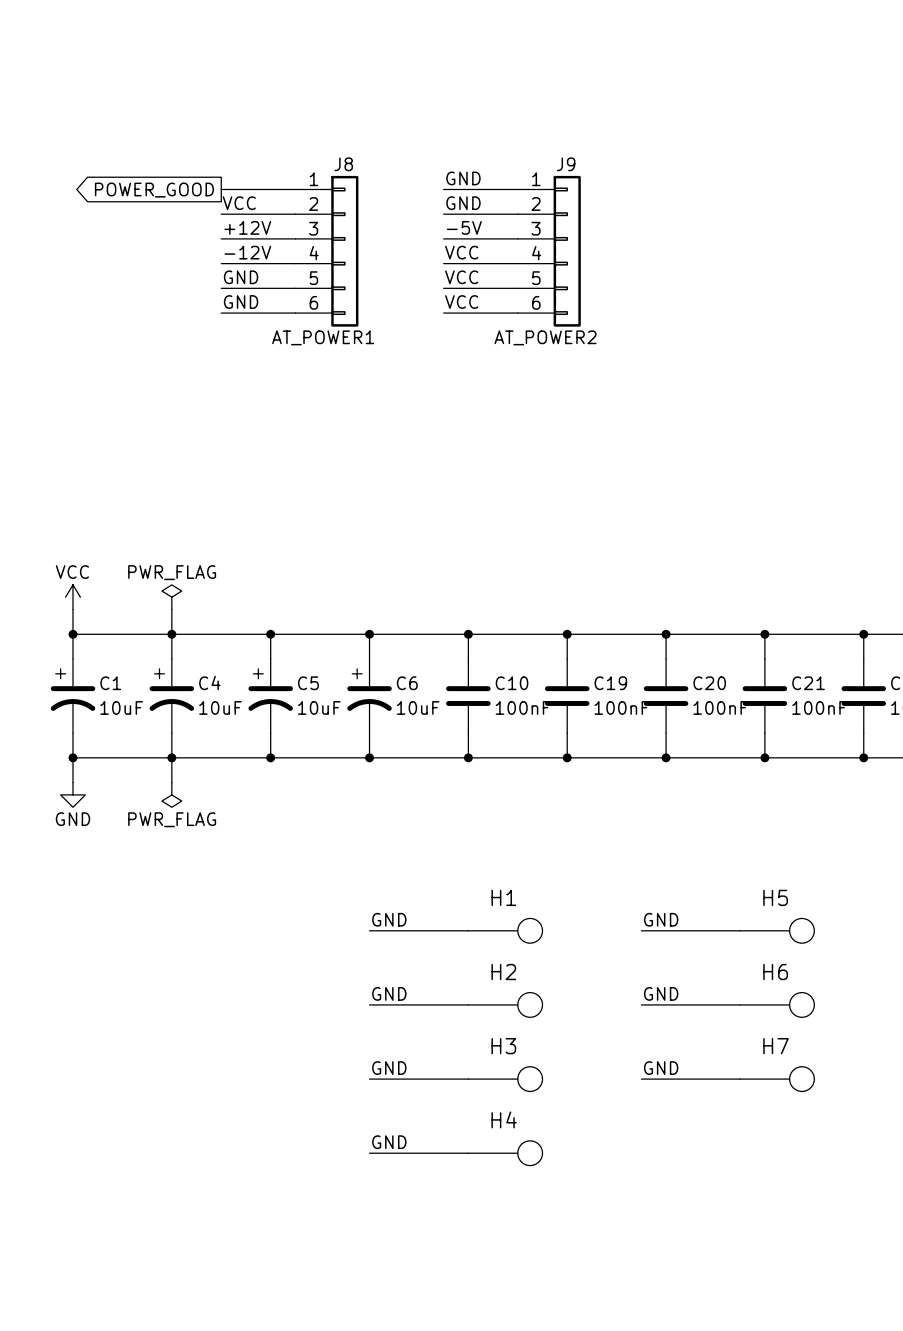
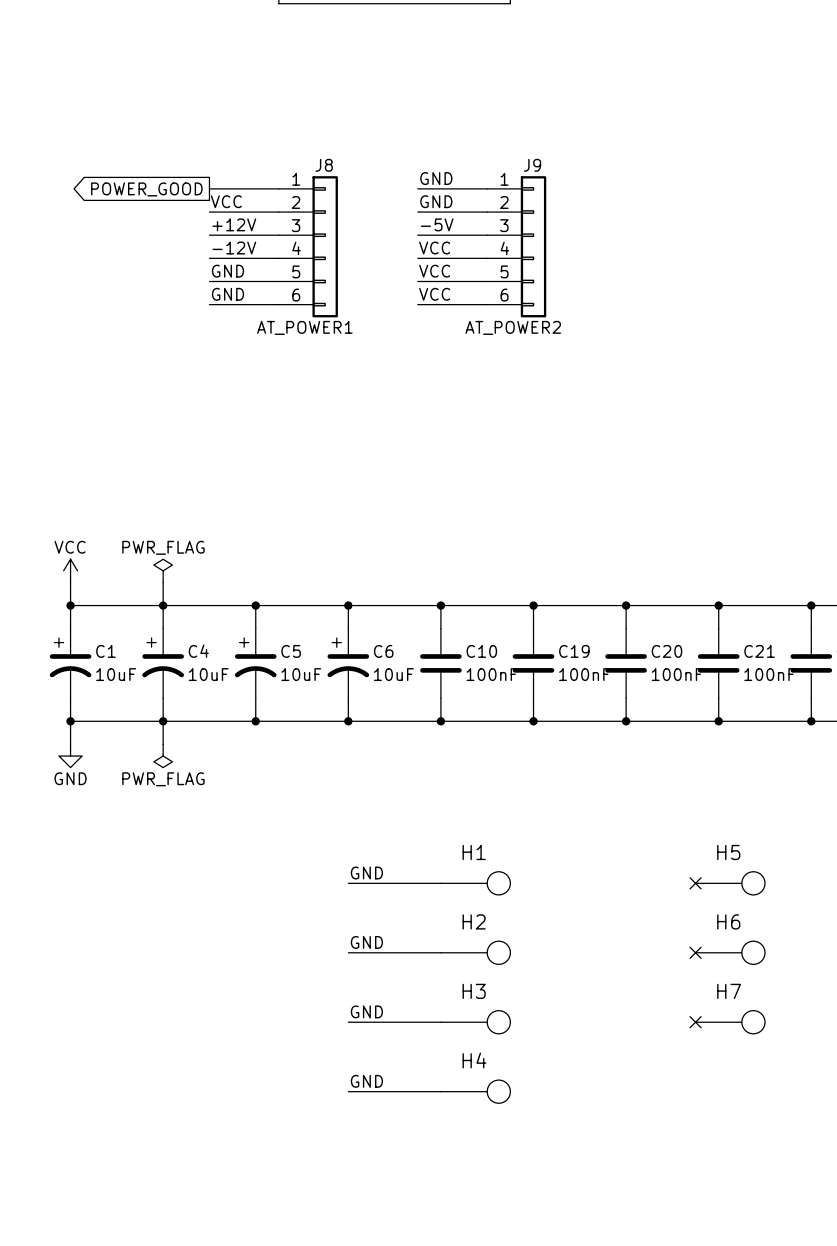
label: GND (661, 919) -> none
wire: (641, 930) (740, 930) -> none
no-connect mark: none -> (695, 883)
label: GND (661, 993) -> none
wire: (641, 1004) (740, 1004) -> none
no-connect mark: none -> (695, 952)
label: GND (661, 1068) -> none
wire: (641, 1079) (740, 1079) -> none
no-connect mark: none -> (695, 1022)

